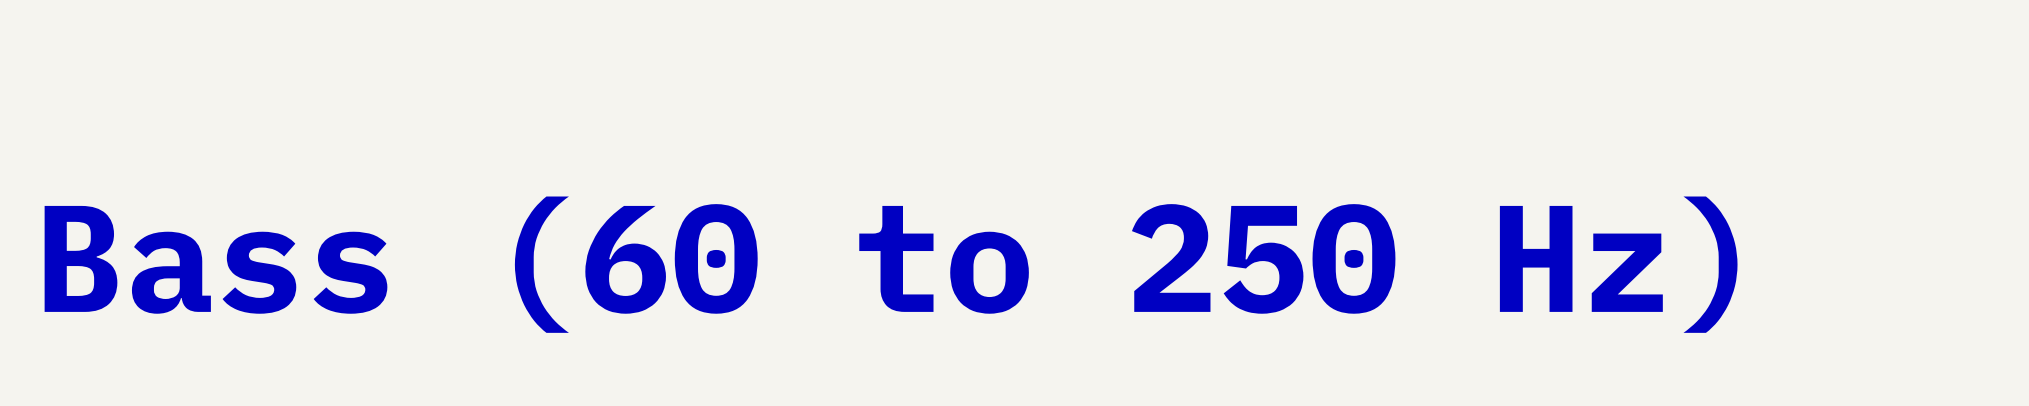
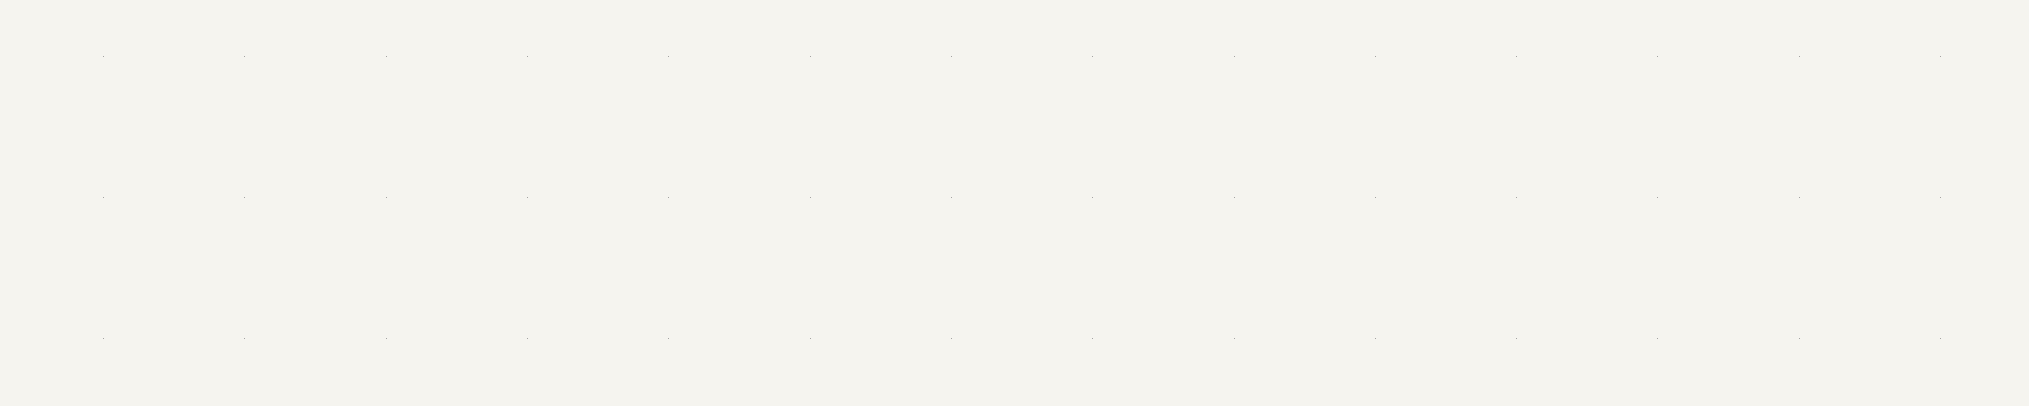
text: Bass (60 to 250 Hz) (891, 264) -> none

